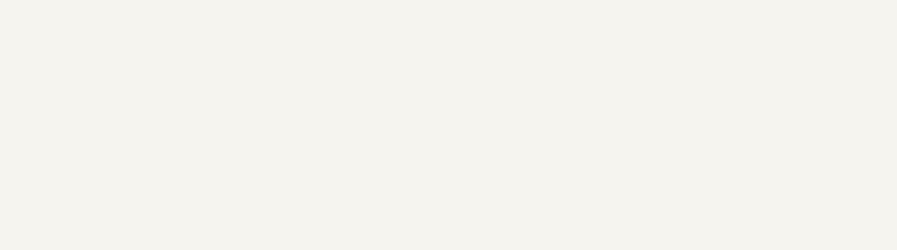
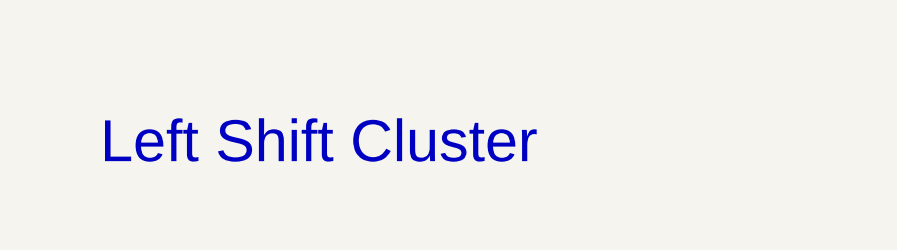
text: none -> Left Shift Cluster (320, 139)

